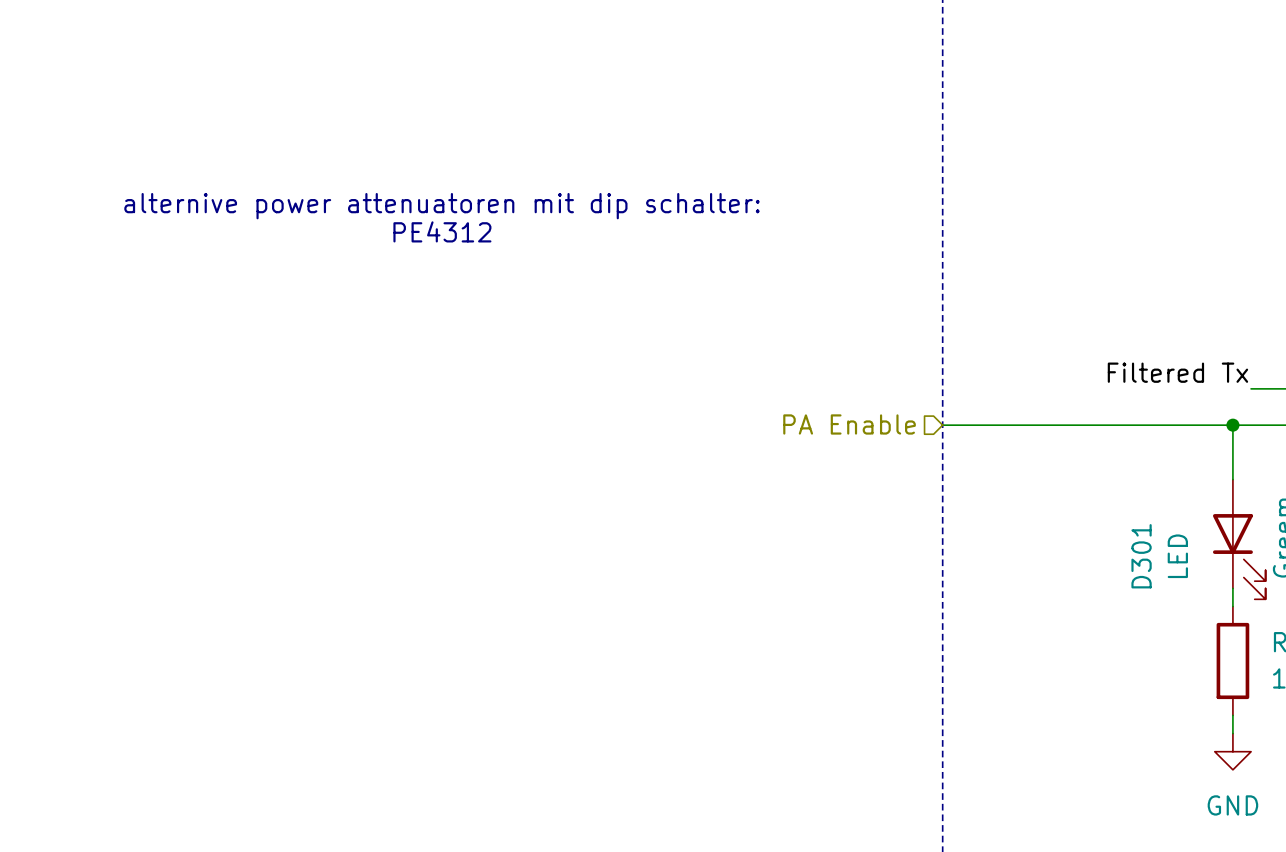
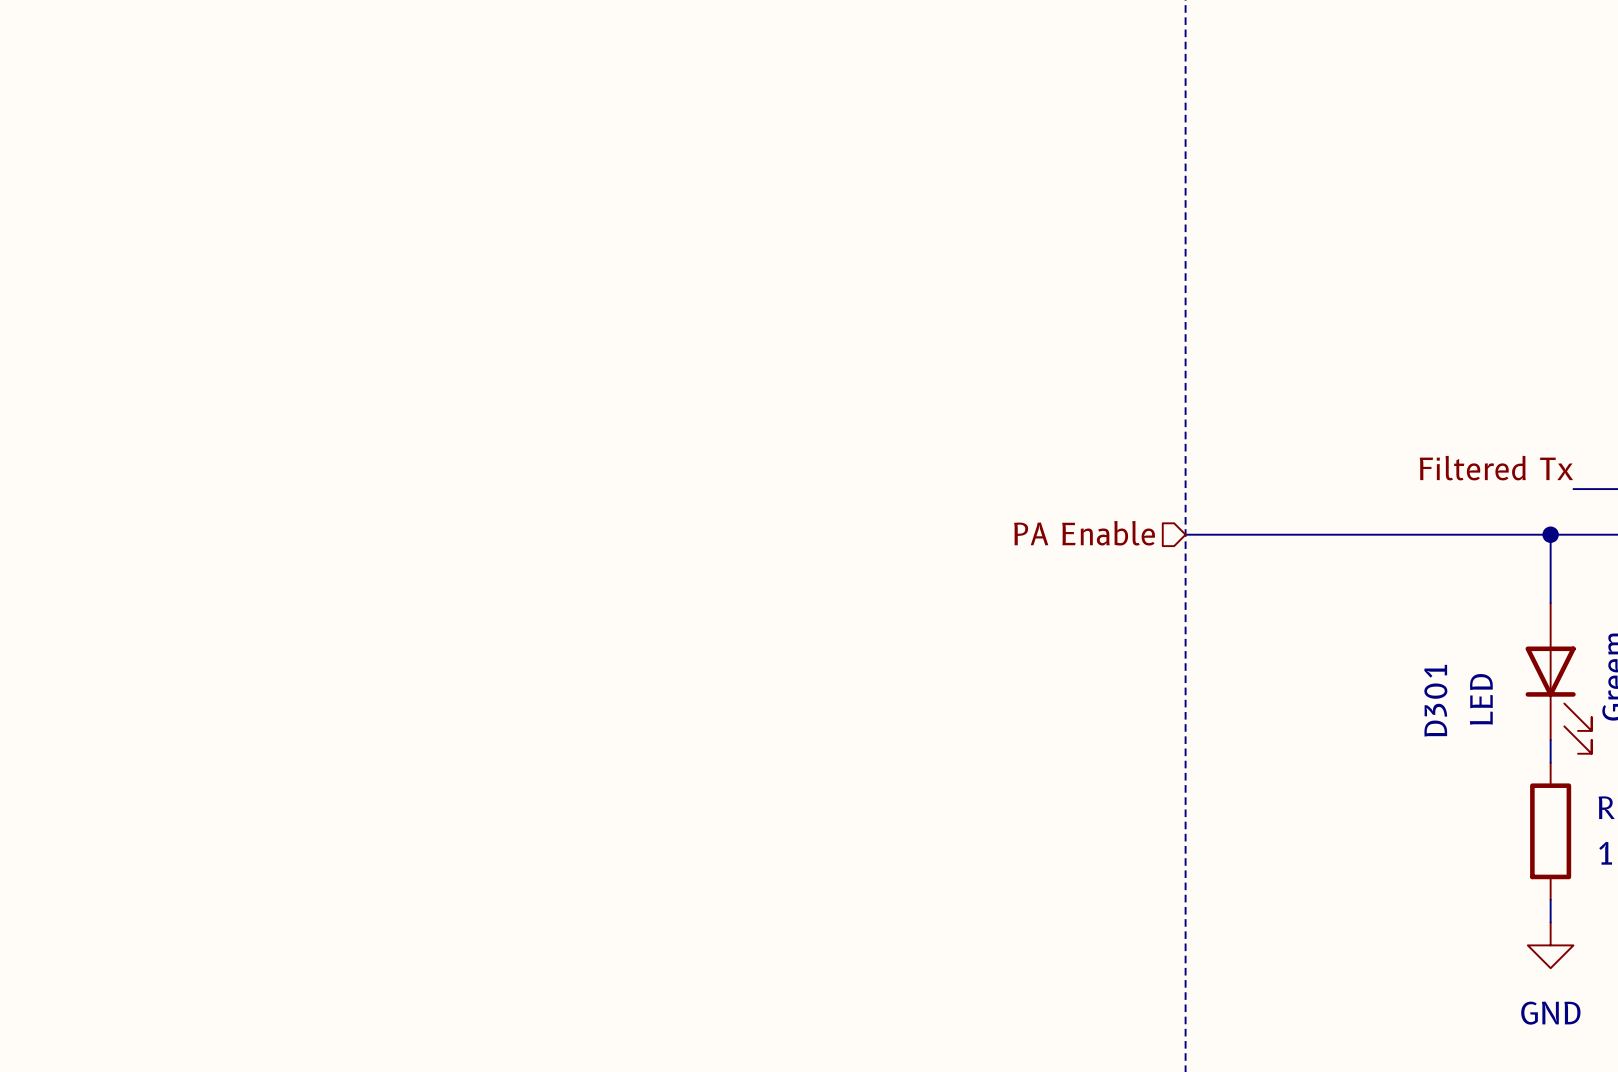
text: alternive power attenuatoren mit dip schalter: (441, 206) -> none
text: PE4312 (442, 231) -> none

